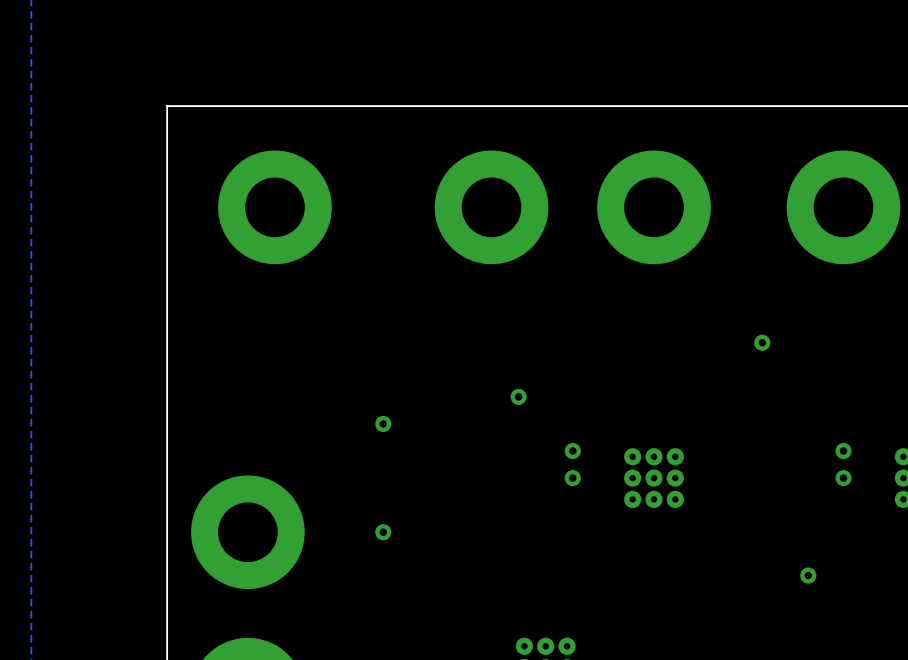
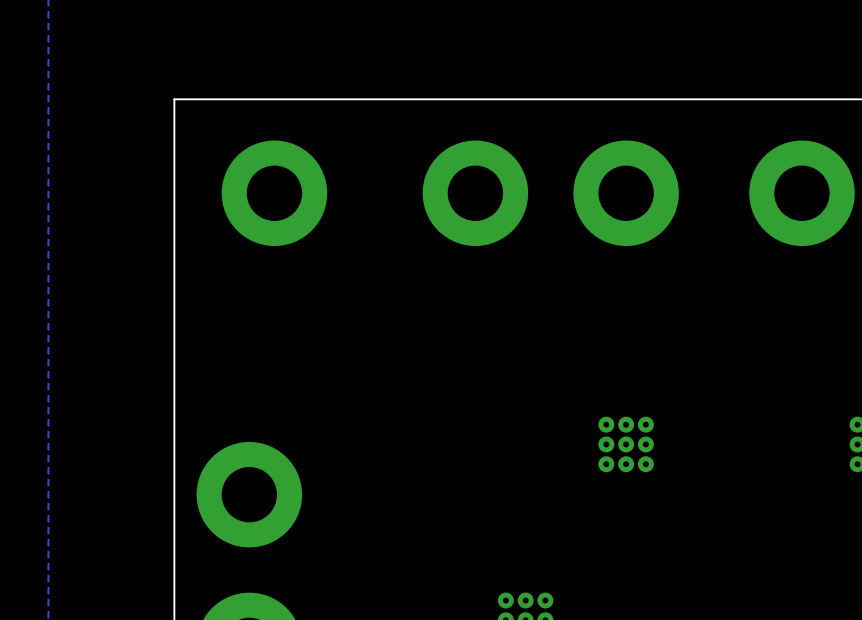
via: (762, 342) -> none
via: (518, 396) -> none
via: (383, 423) -> none
via: (572, 451) -> none
via: (843, 451) -> none
via: (572, 478) -> none
via: (843, 478) -> none
via: (383, 532) -> none
via: (808, 575) -> none

